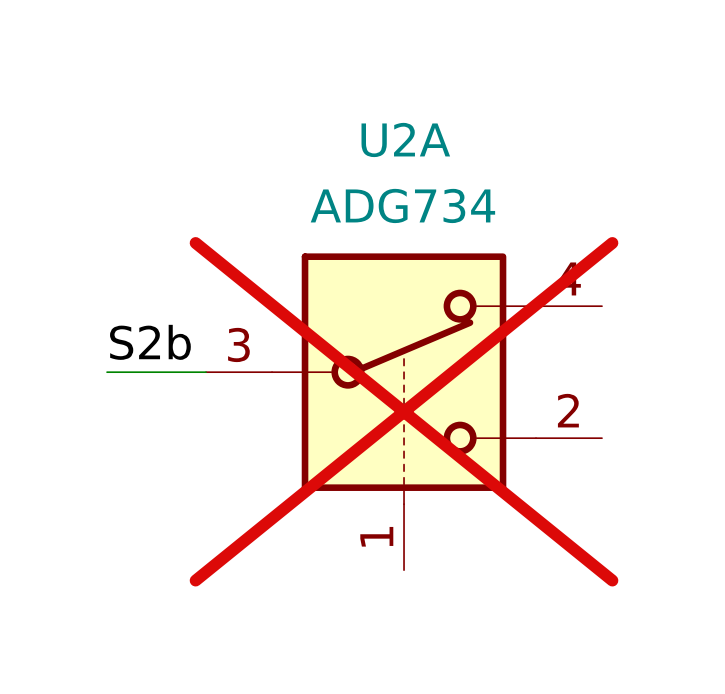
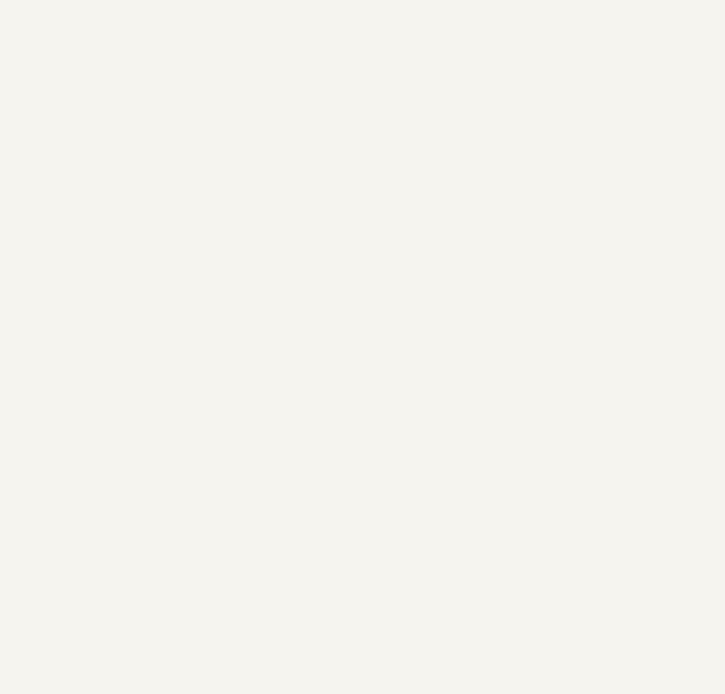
label: S2b (150, 342) -> none
wire: (107, 372) (206, 372) -> none
U2A: ADG734 (404, 411) -> none

